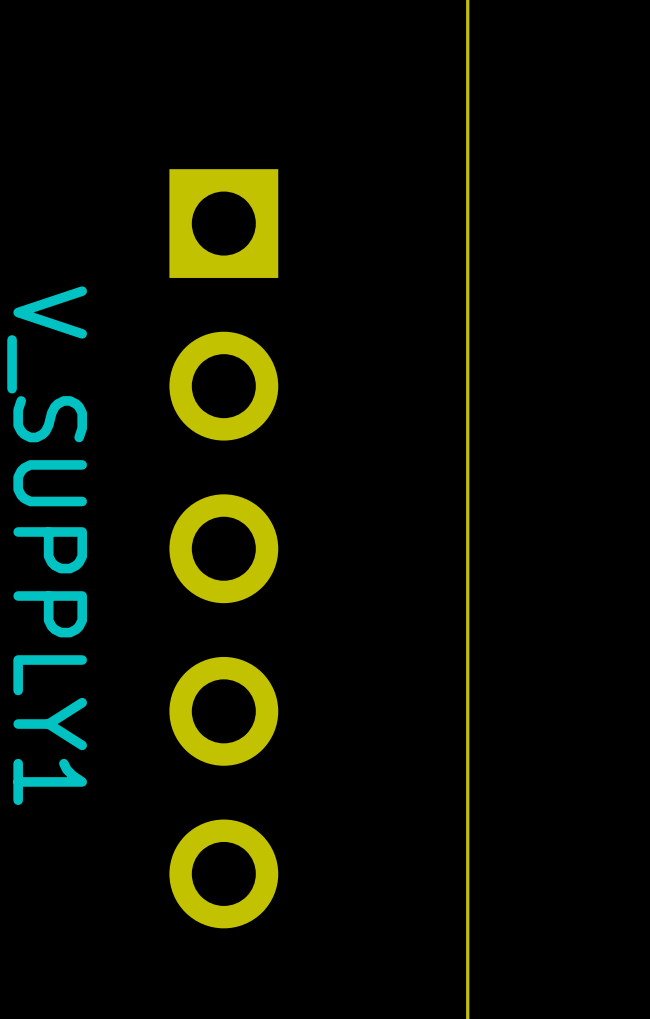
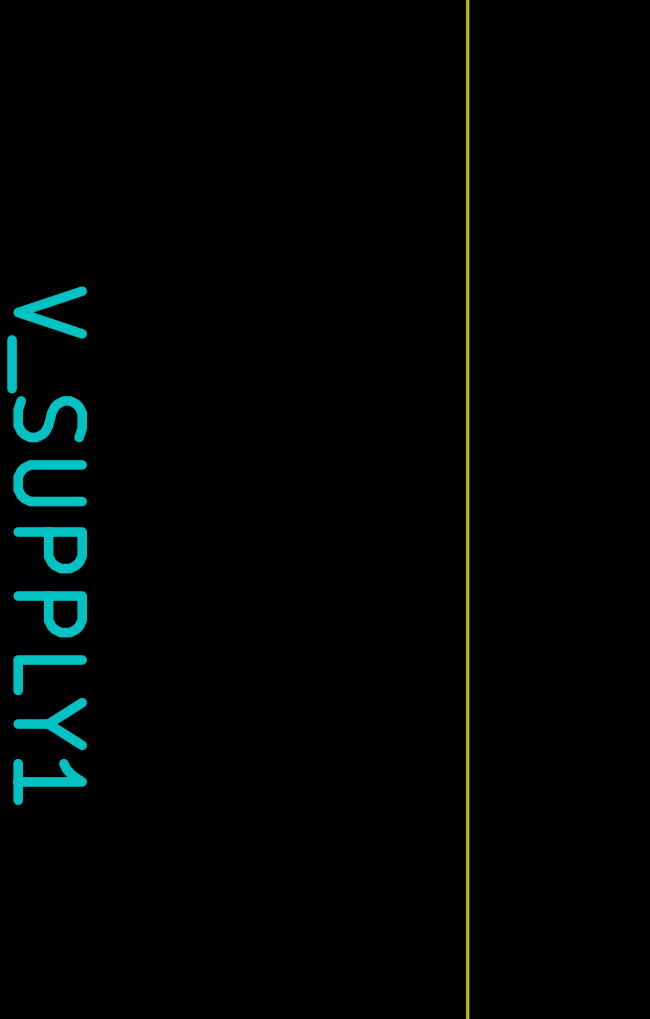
part: (223, 548) -> none

